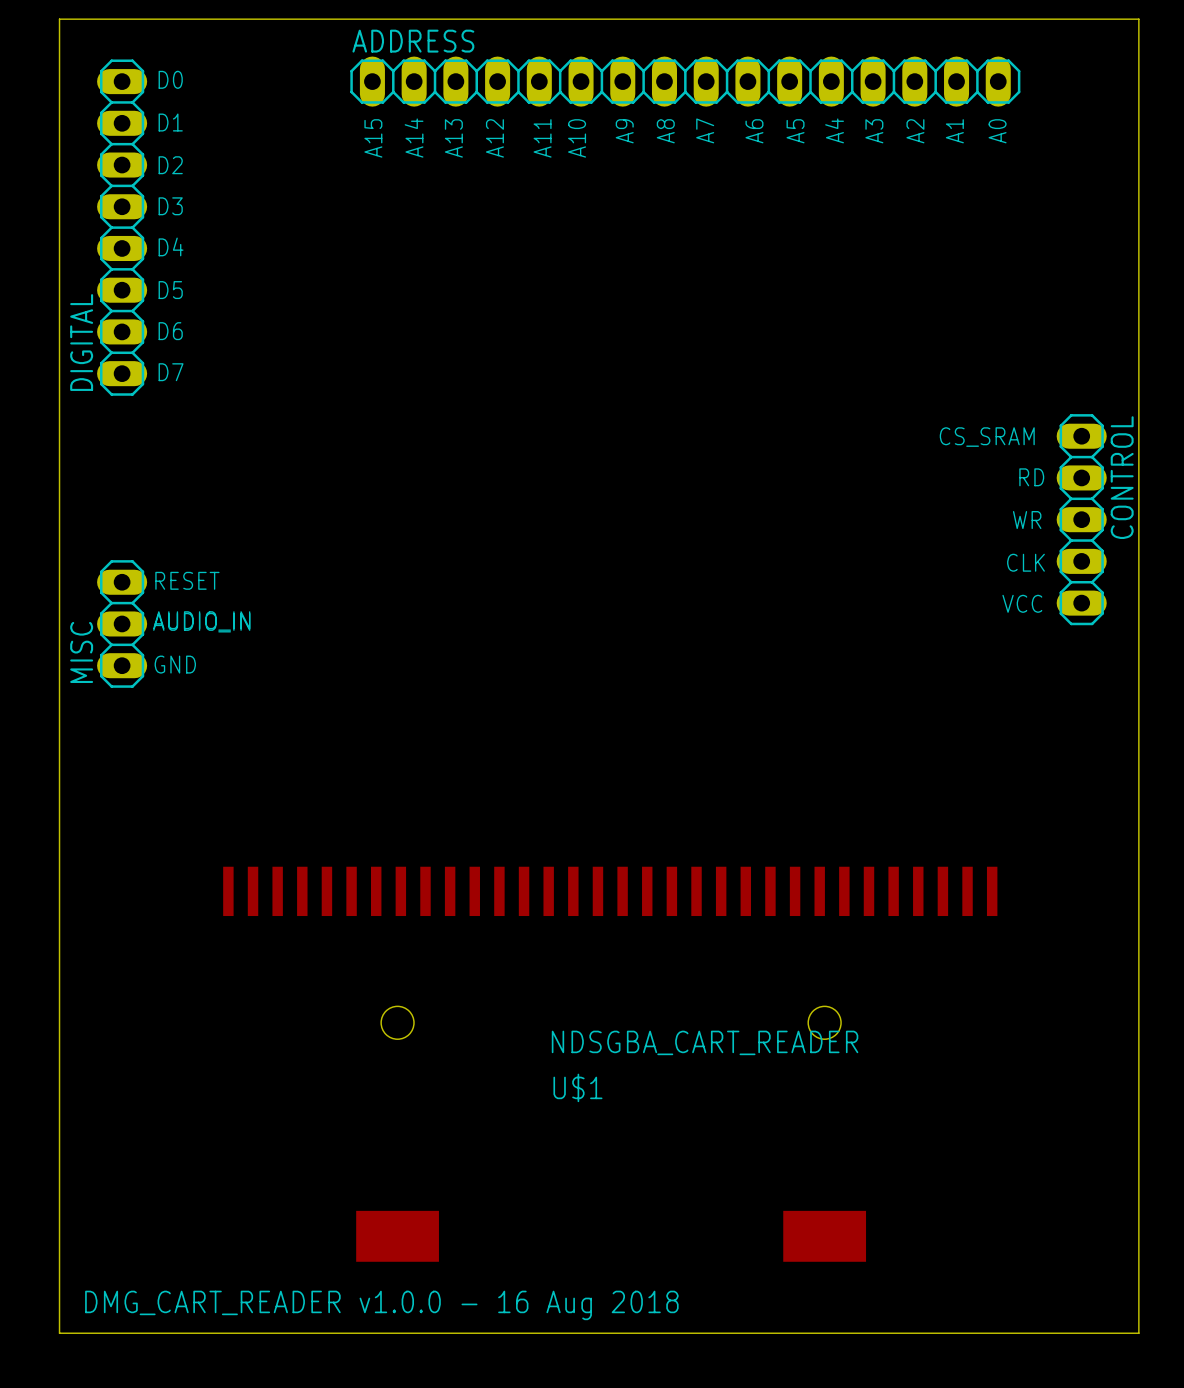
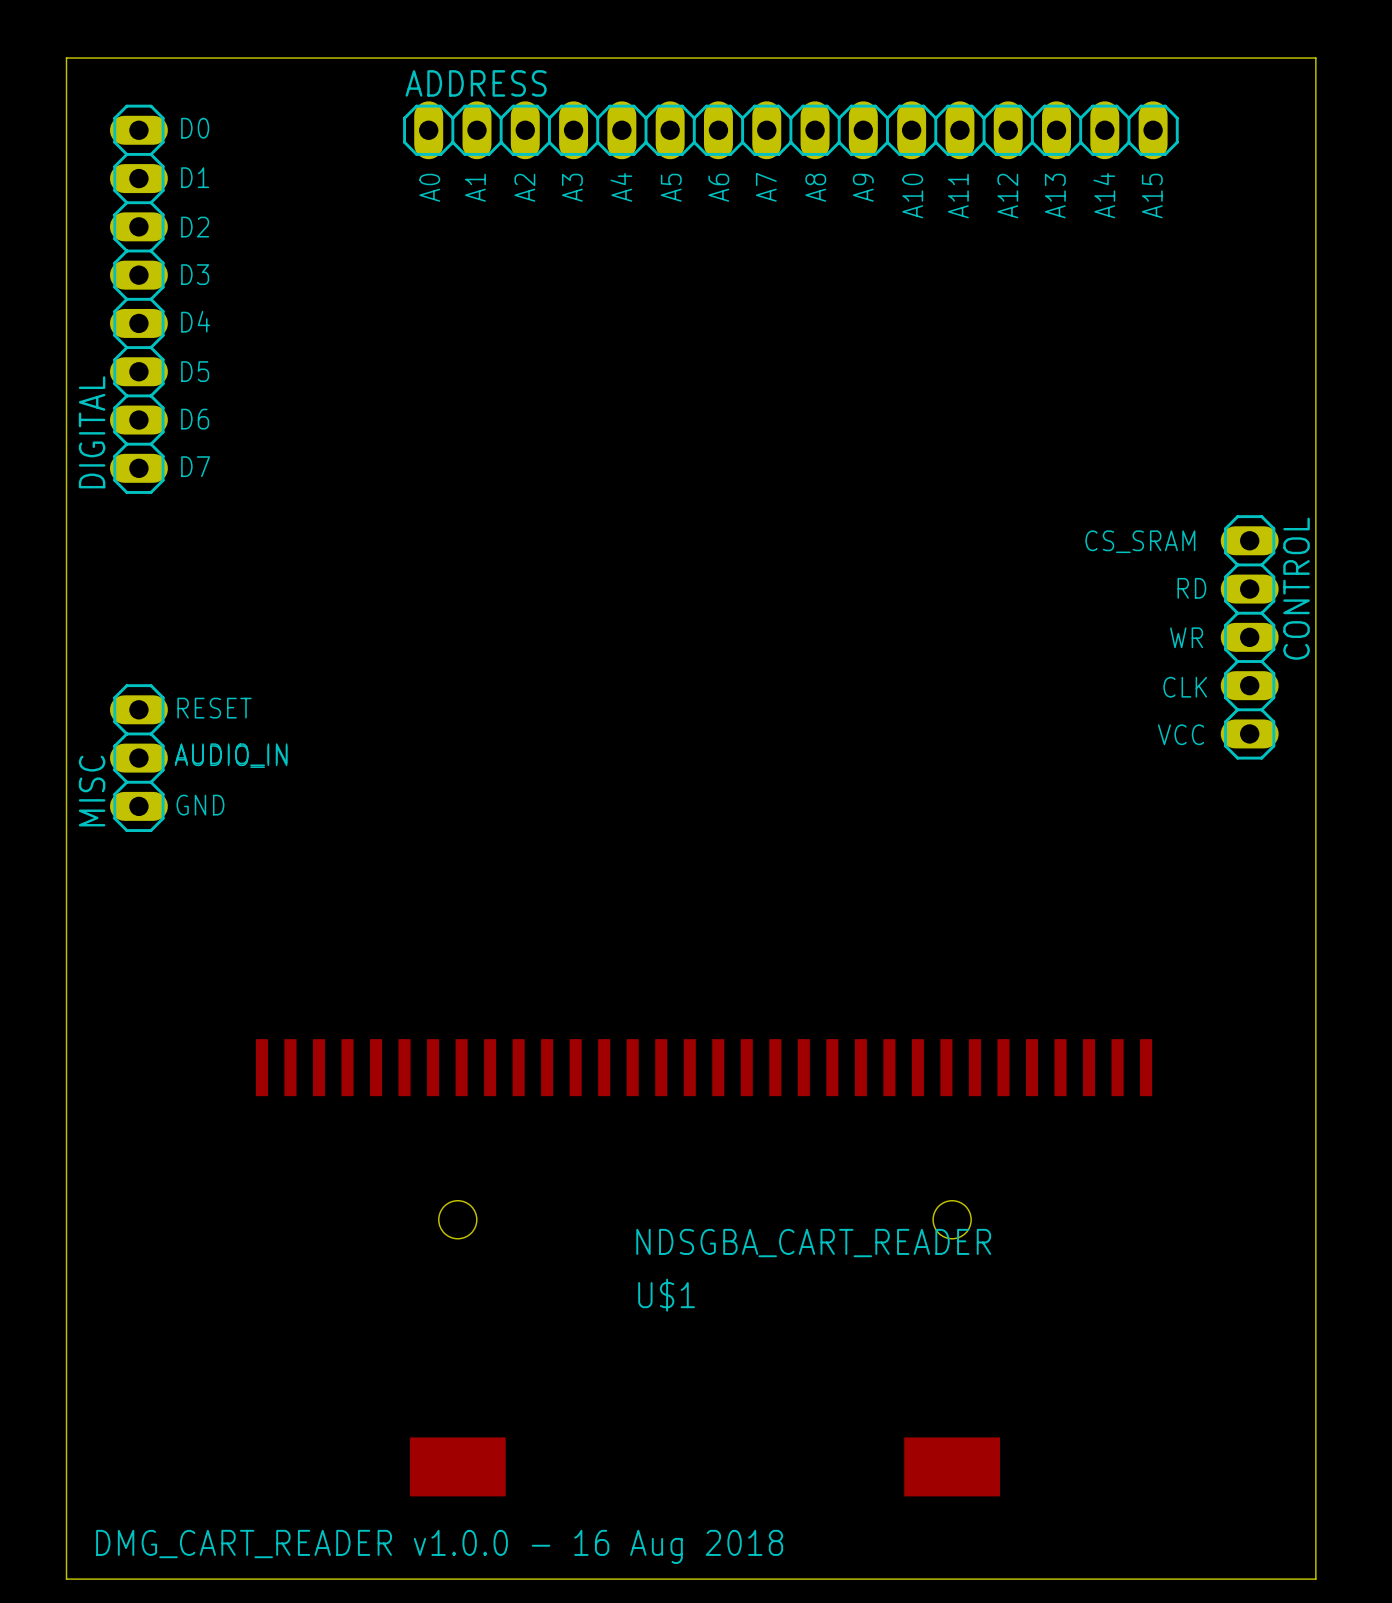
text position: A7 (705, 130) -> A7 (766, 187)
text position: A4 (834, 130) -> A4 (621, 187)
text position: A9 (624, 131) -> A9 (863, 187)
text position: A8 (665, 131) -> A8 (815, 187)
text position: A6 (754, 131) -> A6 (718, 187)
text position: A5 (795, 131) -> A5 (671, 187)
text position: A3 (874, 131) -> A3 (572, 187)
text: A2 (915, 131) -> A13 (1055, 196)
text: A1 (954, 131) -> A14 (1104, 195)
text: A0 (997, 131) -> A15 (1152, 196)
text: A15 (373, 138) -> A0 (429, 187)
text: A14 (414, 138) -> A1 (475, 187)
text: A13 (453, 138) -> A2 (524, 187)
text position: A12 (494, 138) -> A12 (1007, 196)
text position: A11 (542, 138) -> A11 (958, 196)
text position: A10 (577, 138) -> A10 (912, 196)

